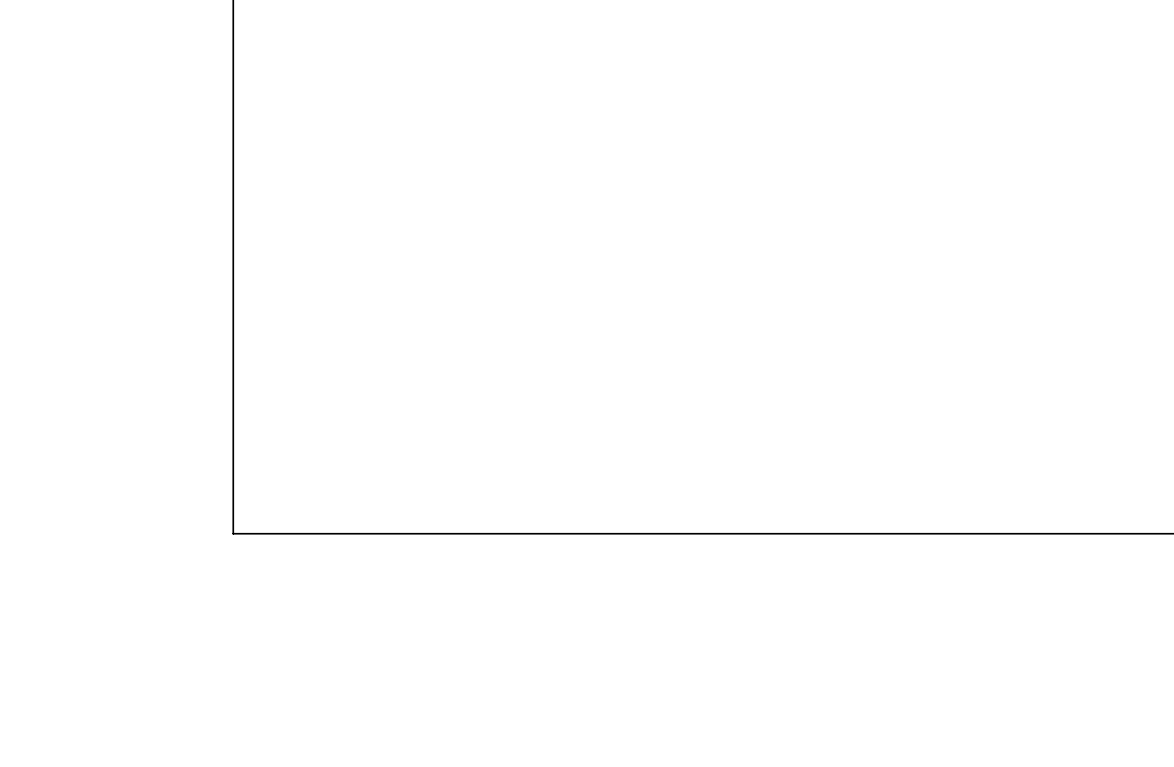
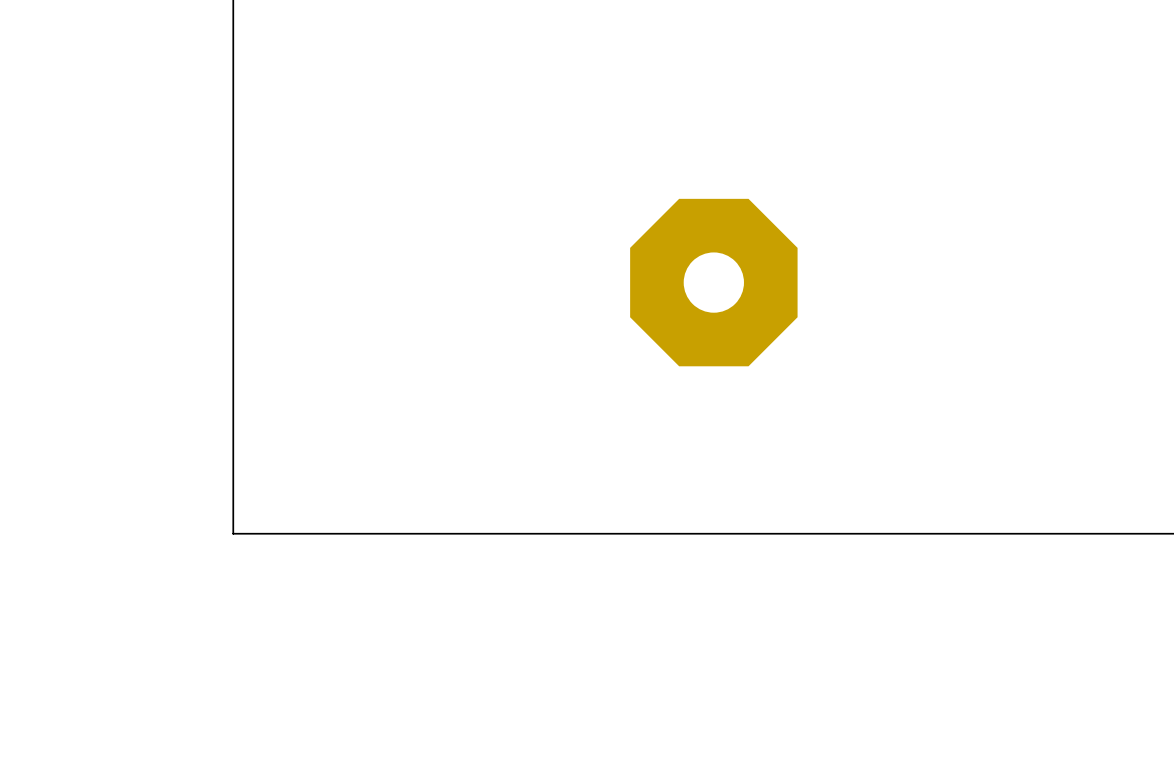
part: none -> (713, 282)

